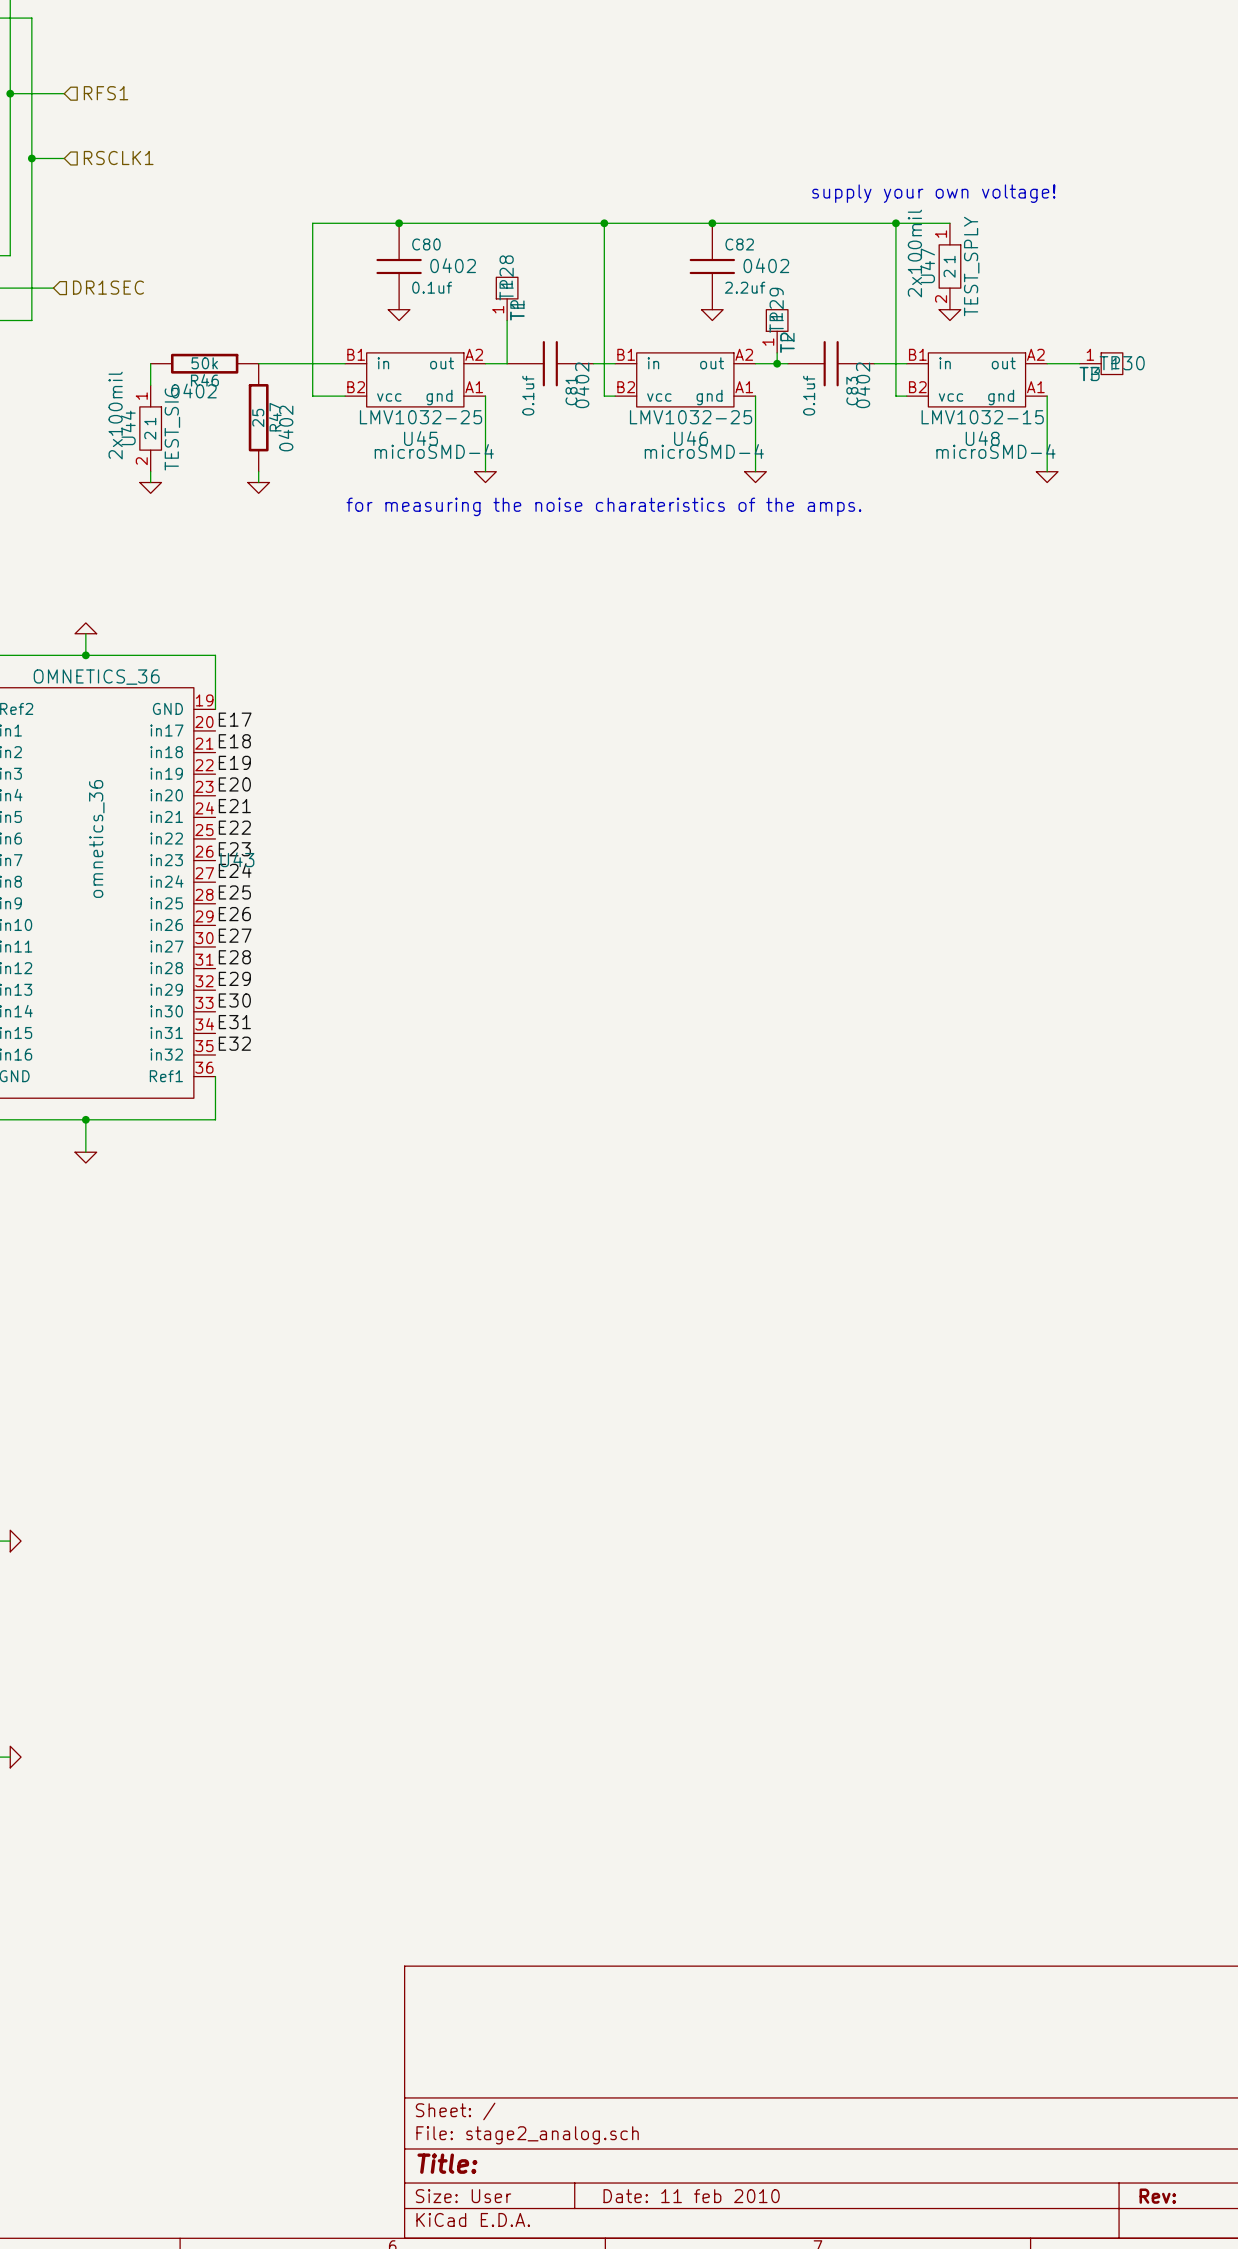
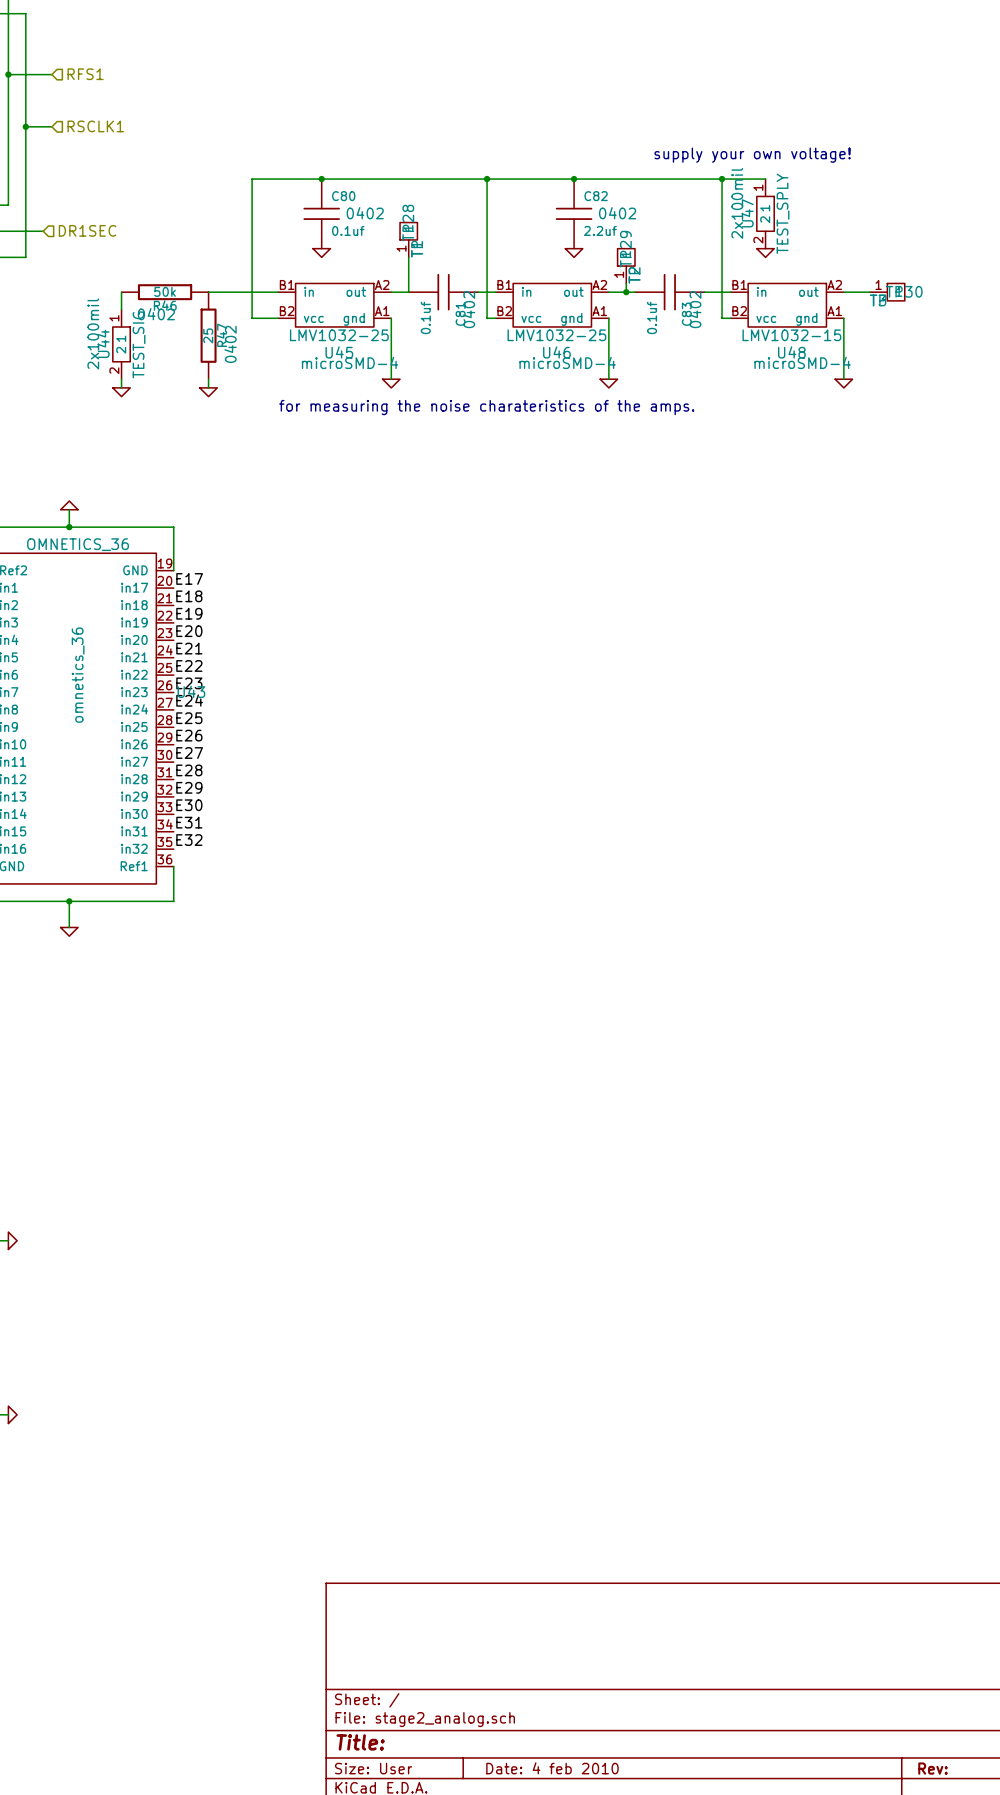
title block: Date: 11 feb 2010 (691, 2196) -> Date: 4 feb 2010 (552, 1768)

